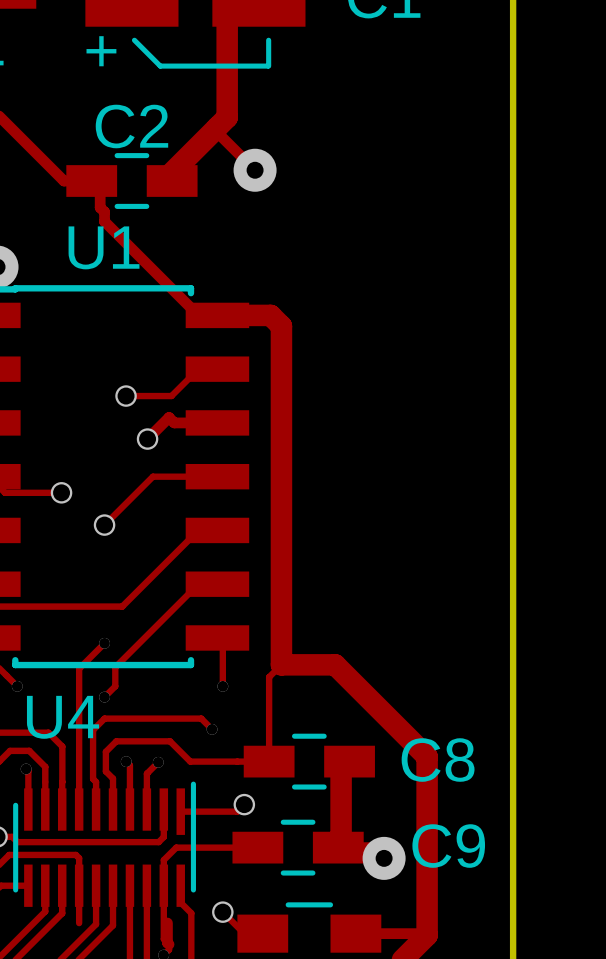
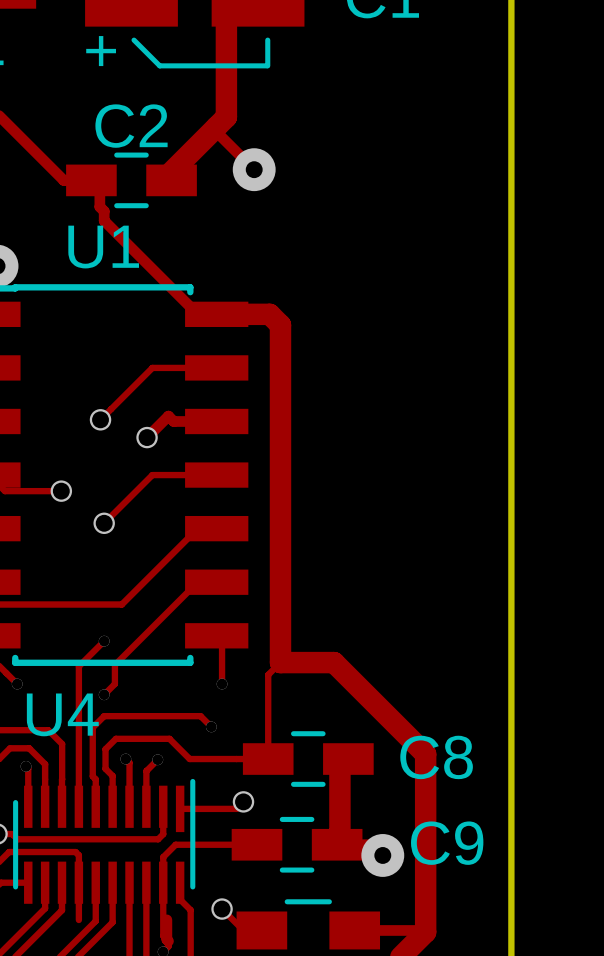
track: (198, 369) (171, 396) (126, 396) -> (197, 367) (152, 367) (100, 419)
via position: (126, 396) -> (100, 419)

